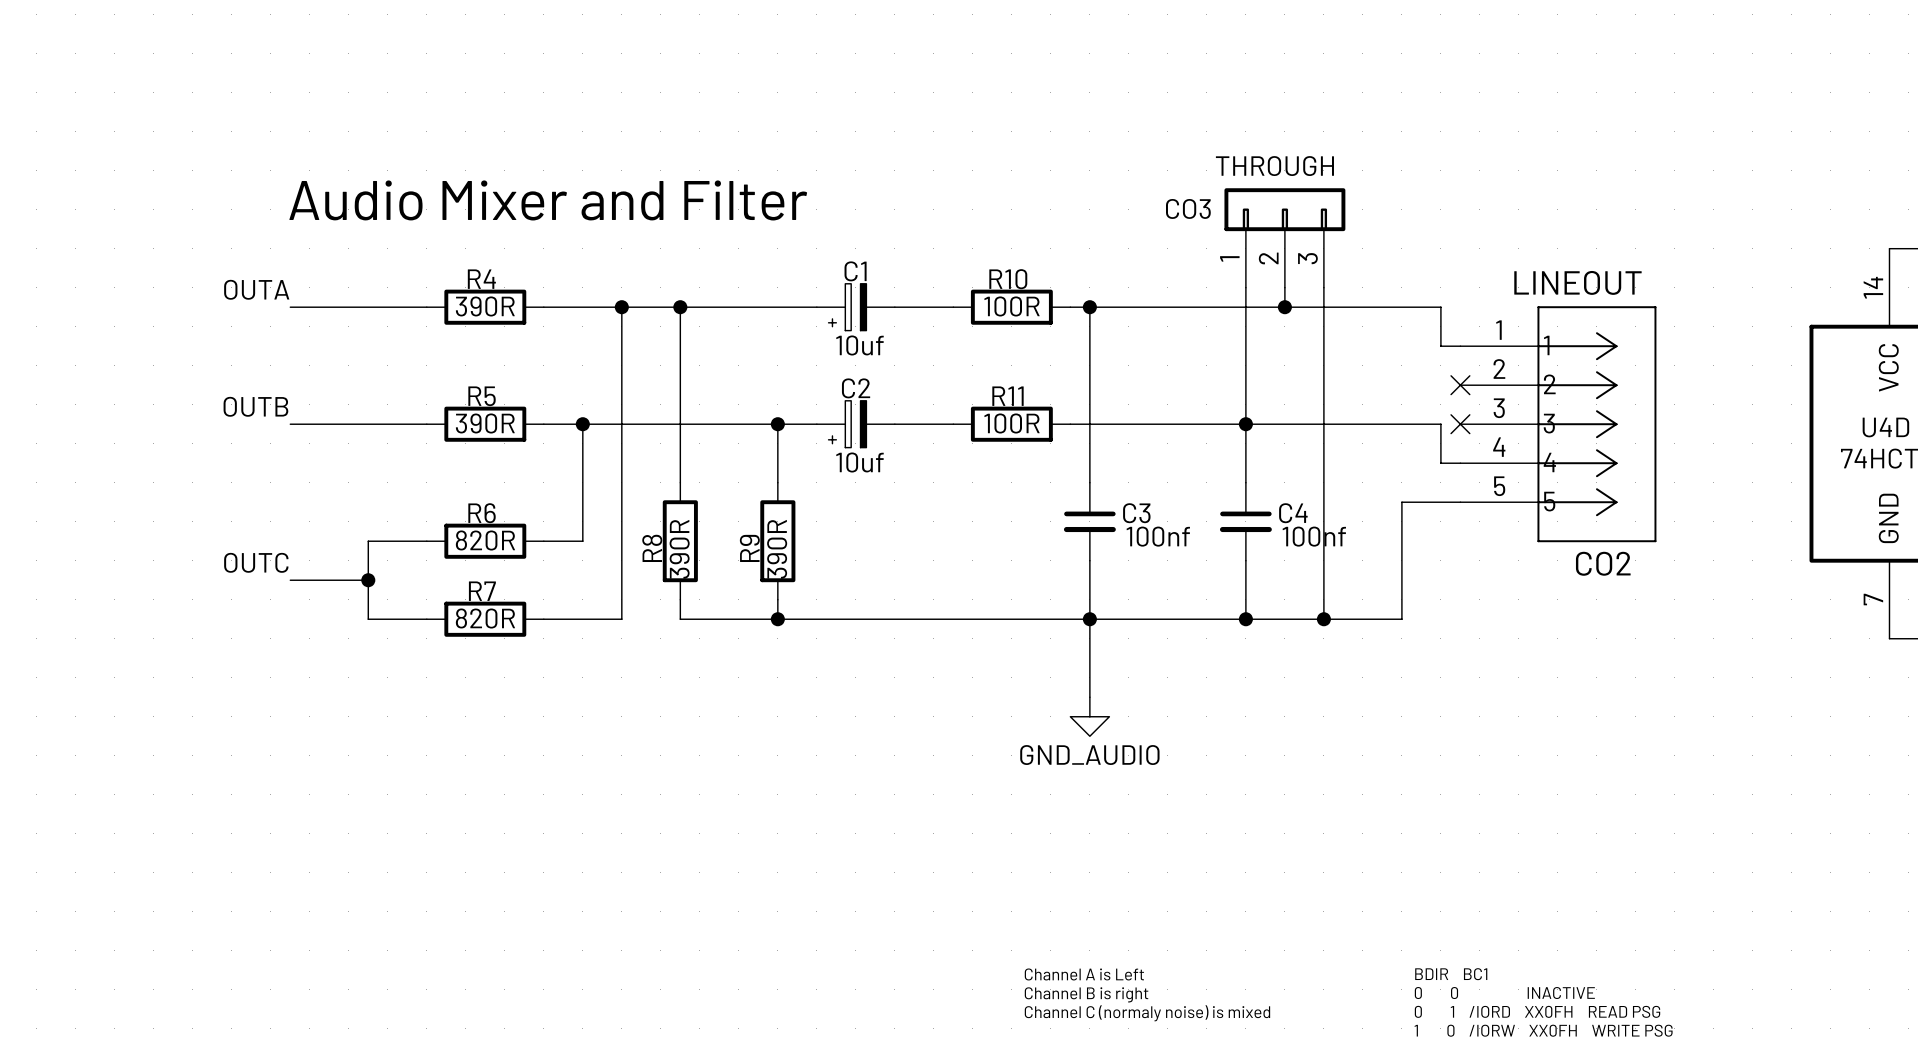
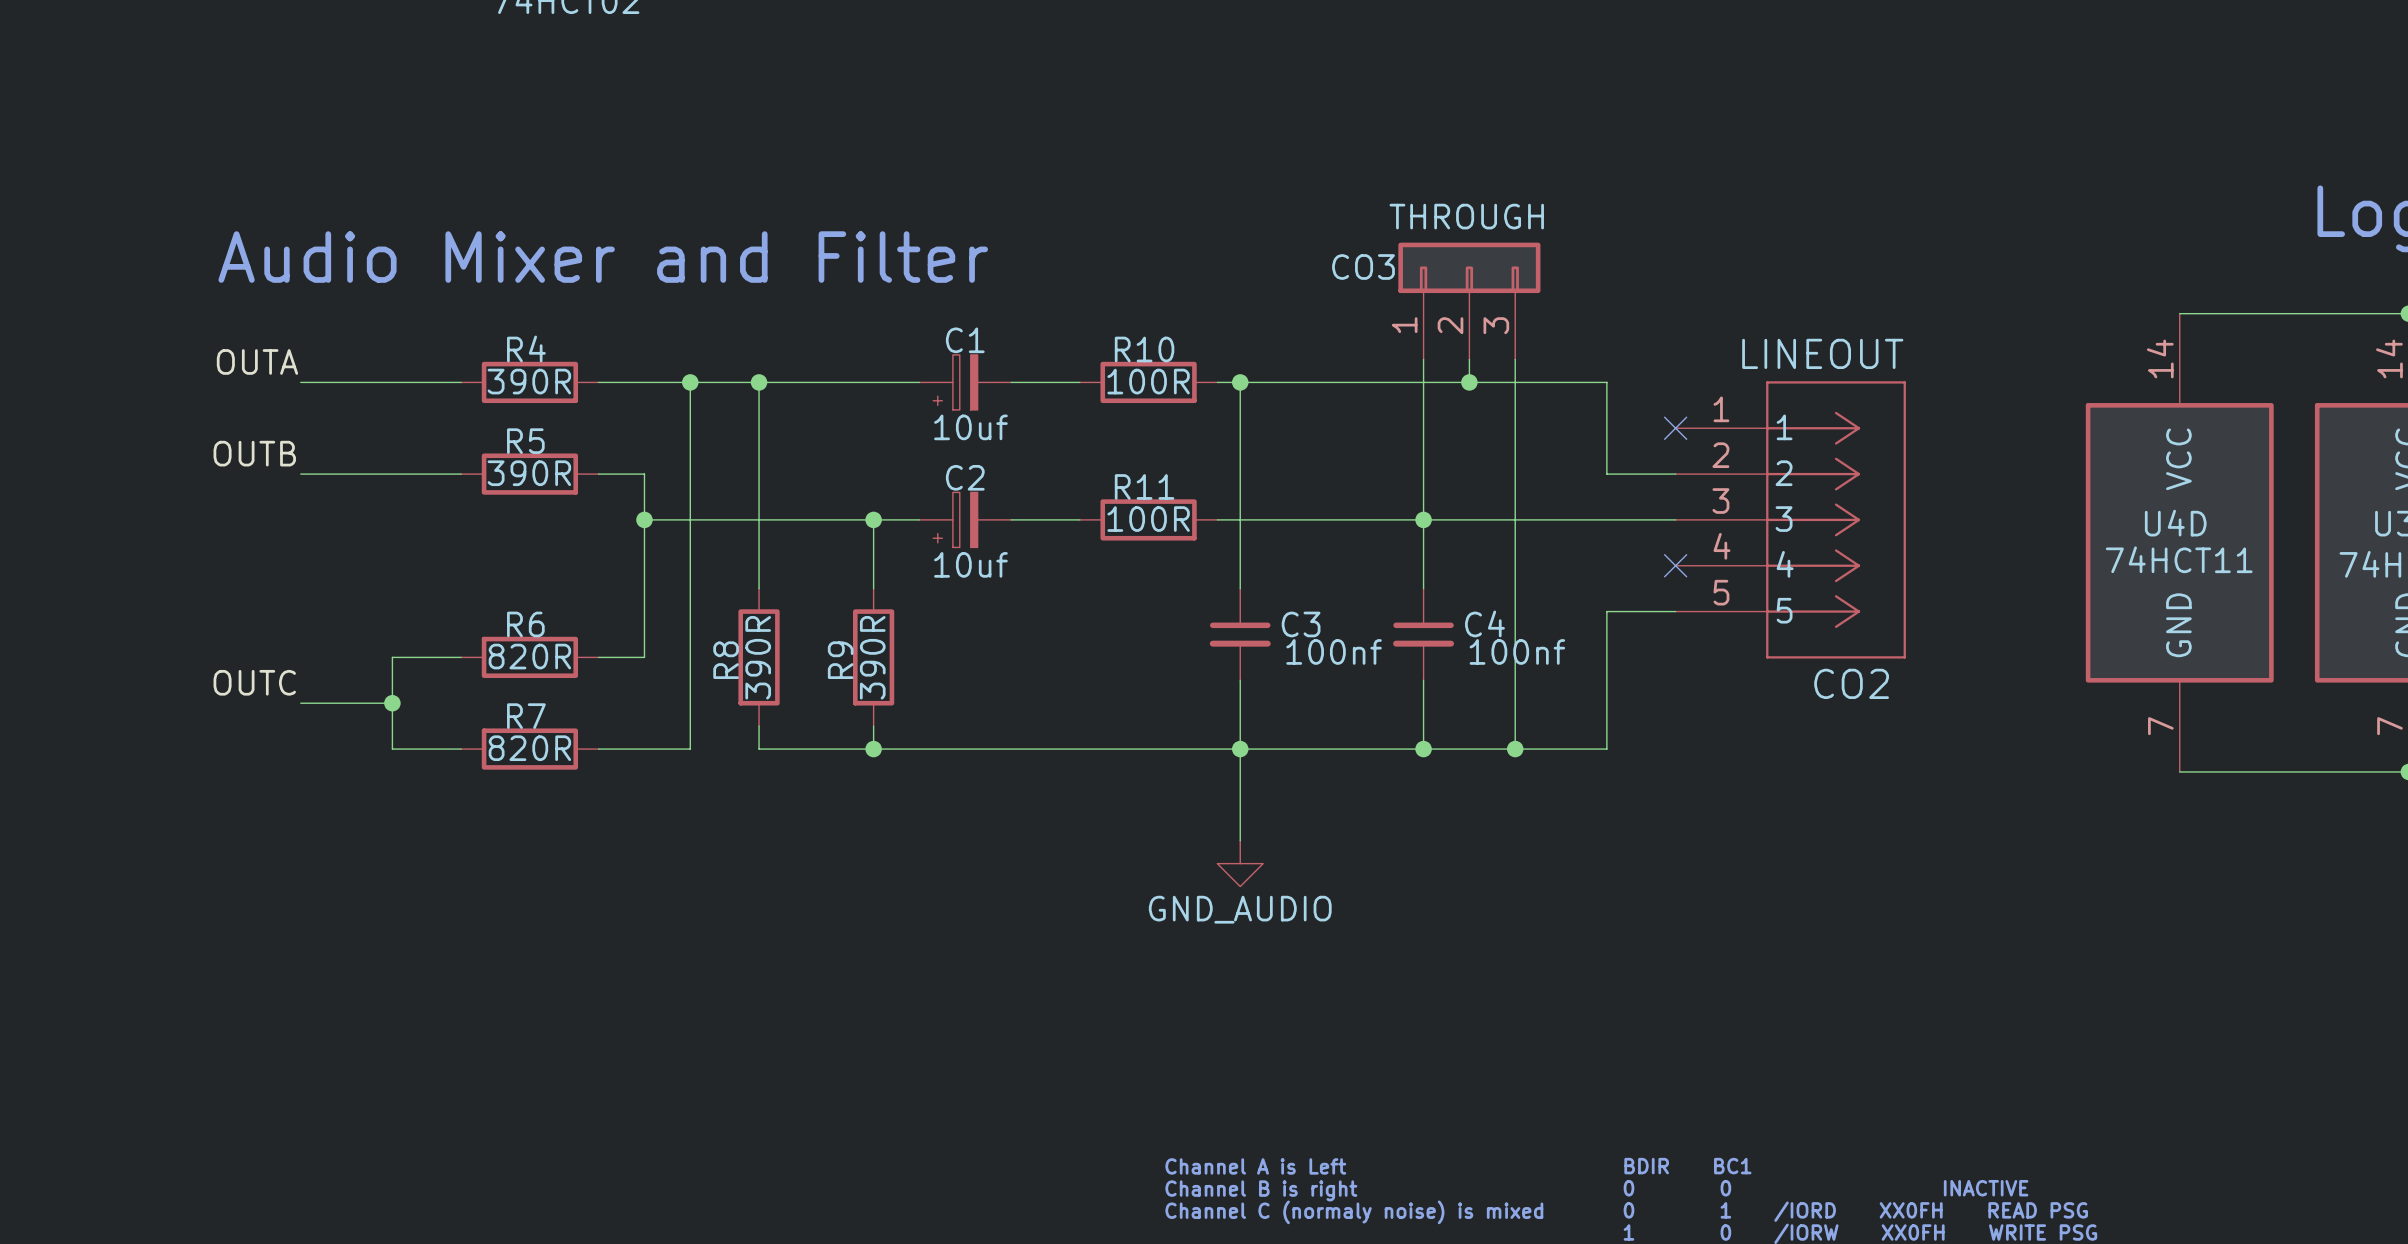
wire: (1401, 307) (1440, 307) (1440, 346) (1460, 346) -> (1606, 382) (1606, 474) (1675, 474)
no-connect mark: none -> (1675, 428)
no-connect mark: (1460, 385) -> none
label position: OUTB (255, 406) -> OUTB (254, 453)
wire: (290, 424) (426, 424) -> (300, 474) (461, 474)
R5 position: (485, 424) -> (529, 474)
wire: (543, 424) (582, 424) -> (598, 474) (644, 474) (644, 519)
wire: (1440, 424) (1440, 463) (1460, 463) -> (1652, 519) (1675, 519)
no-connect mark: (1460, 424) -> none
no-connect mark: none -> (1675, 565)

